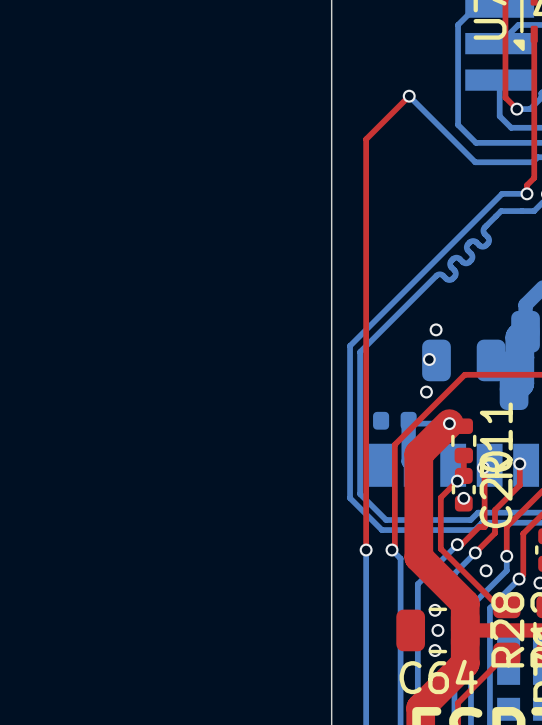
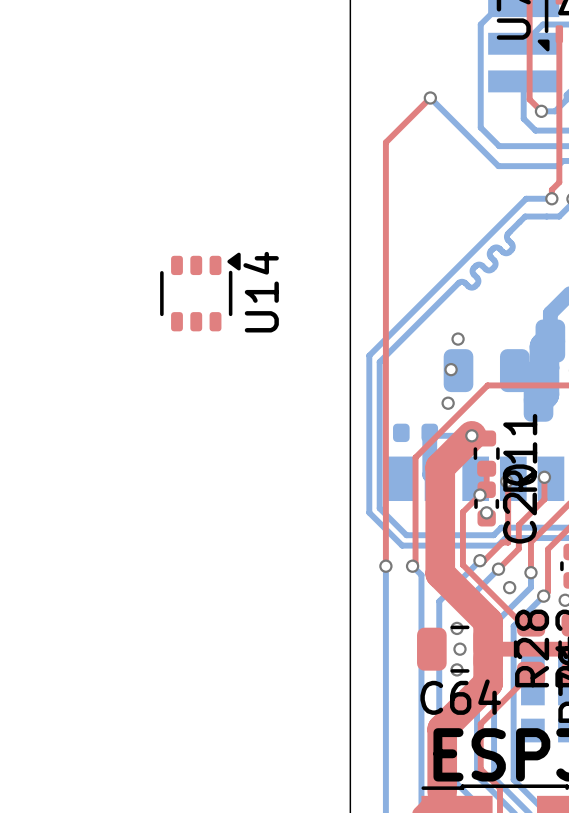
U14: none -> (200, 292)

